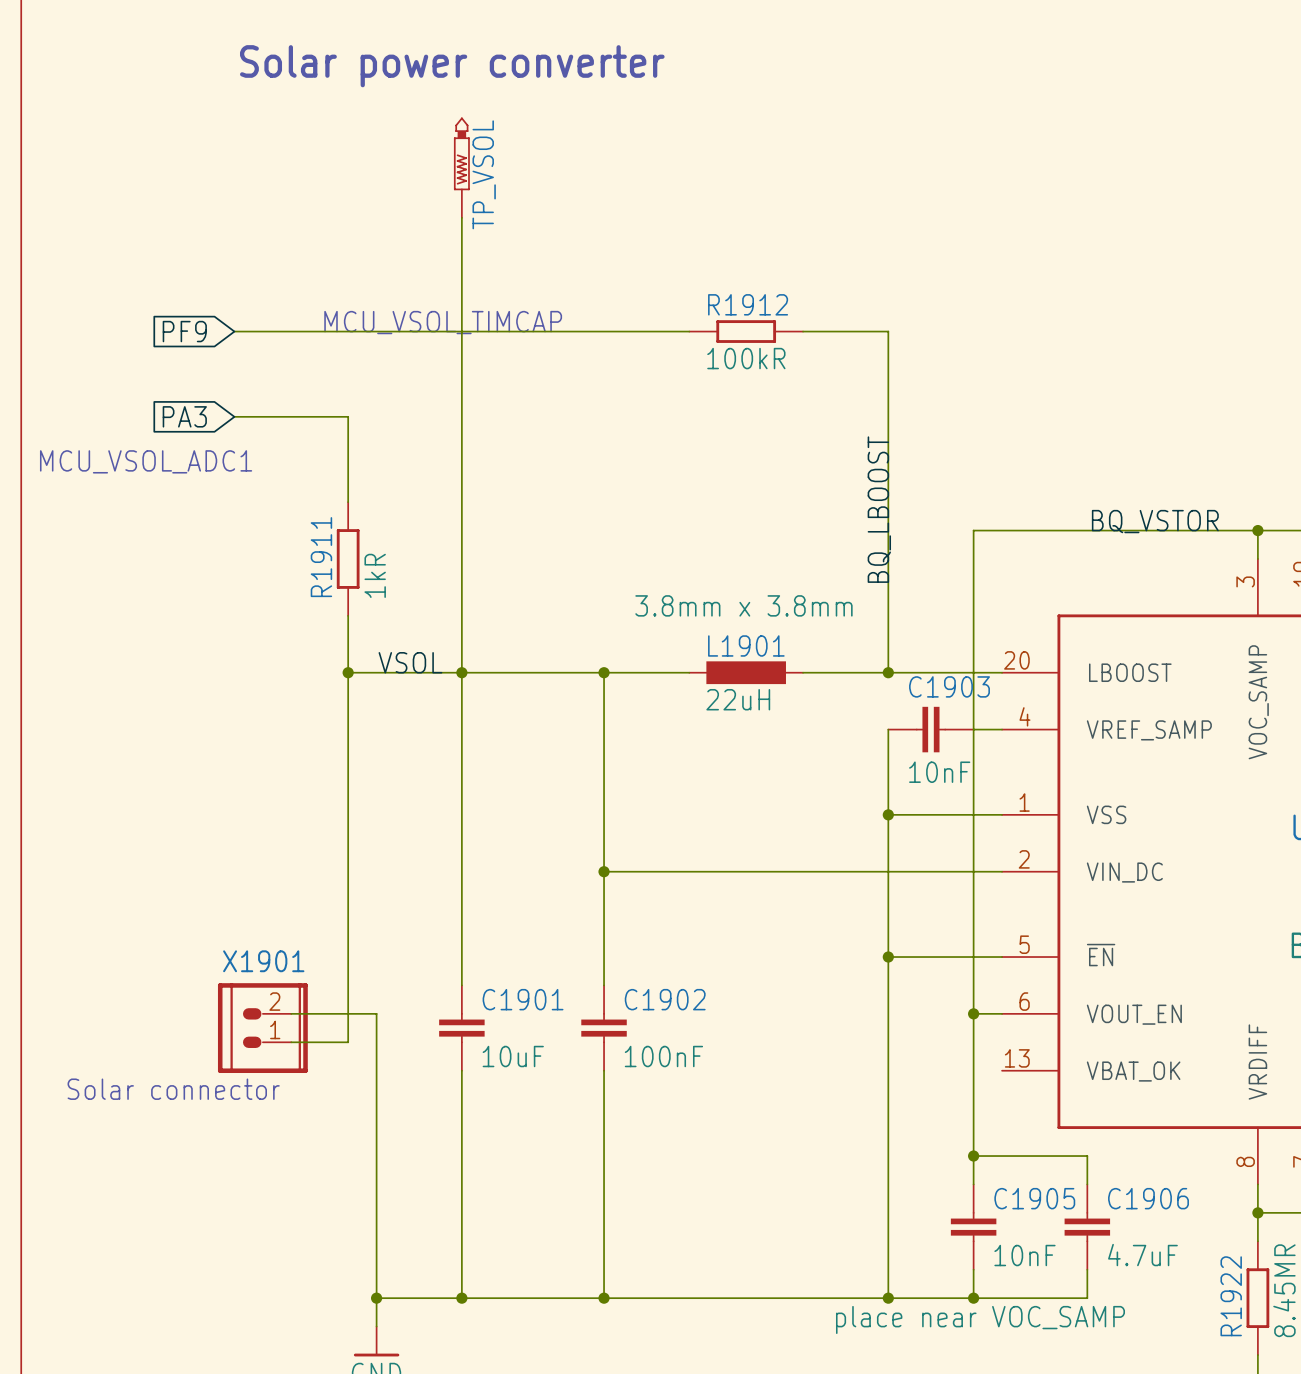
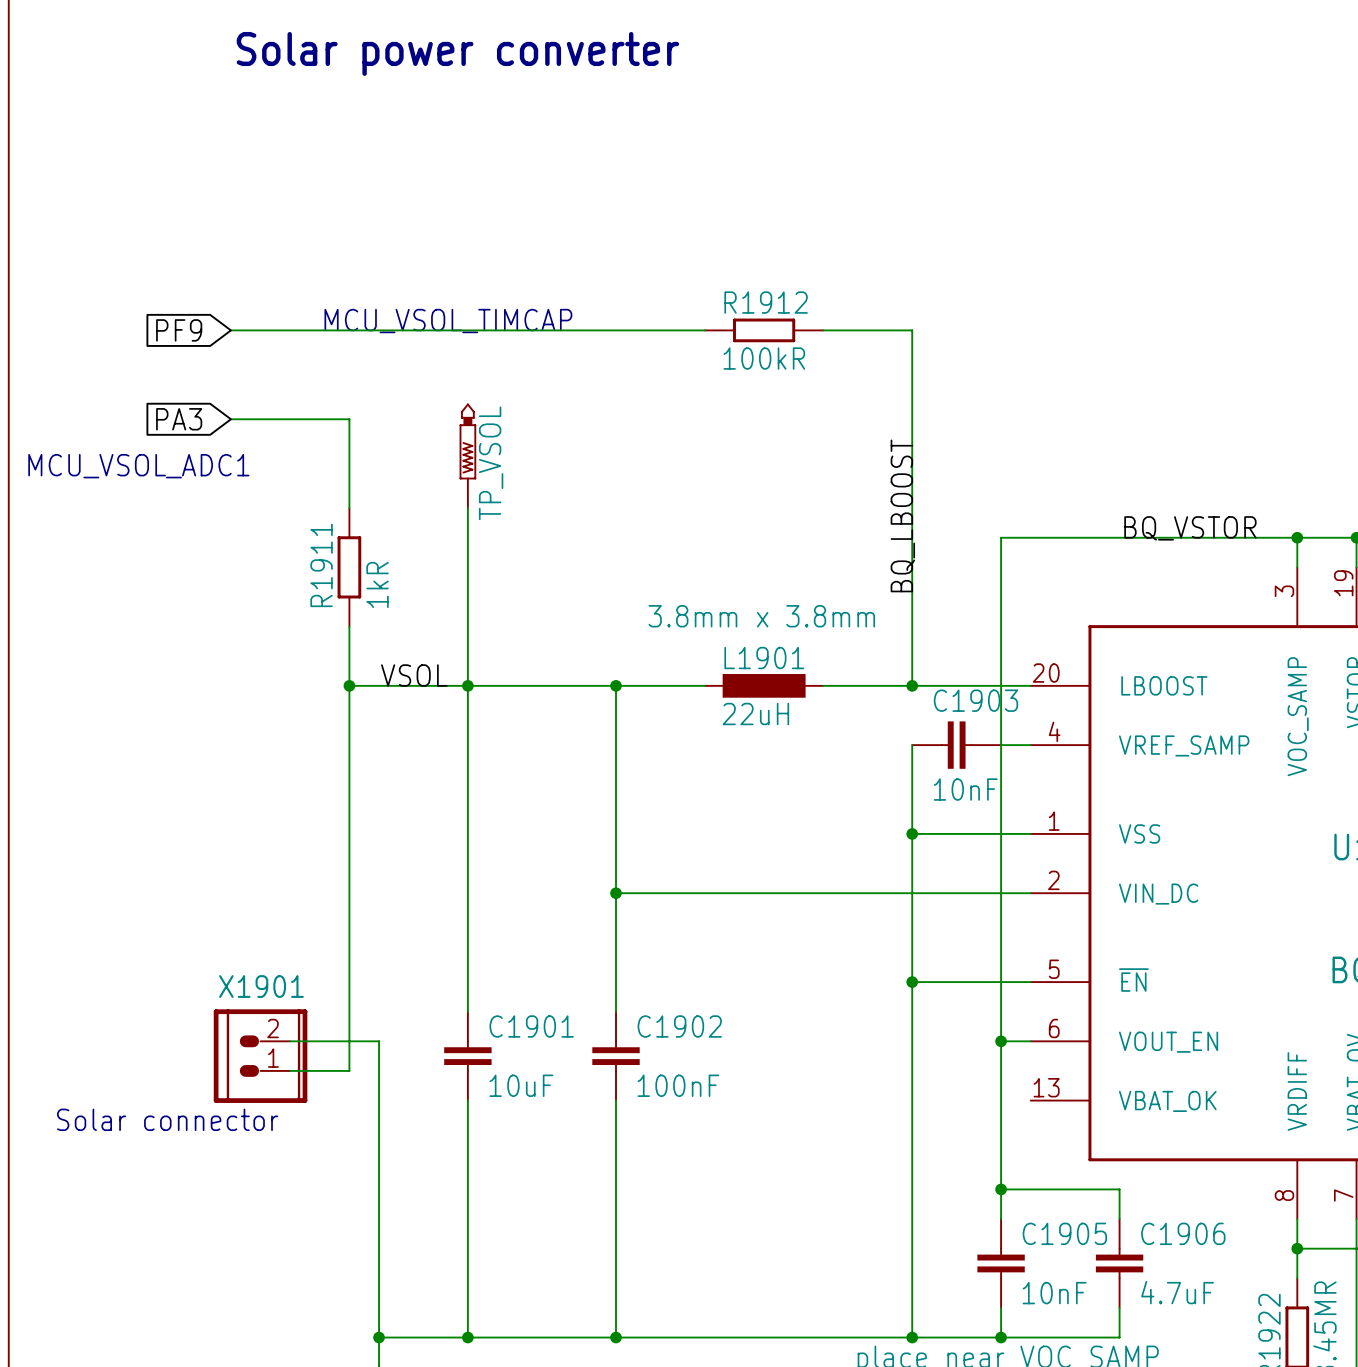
TP_VSOL: (461, 167) -> none
wire: (461, 217) (461, 502) -> none
TP_VSOL: none -> (467, 455)

